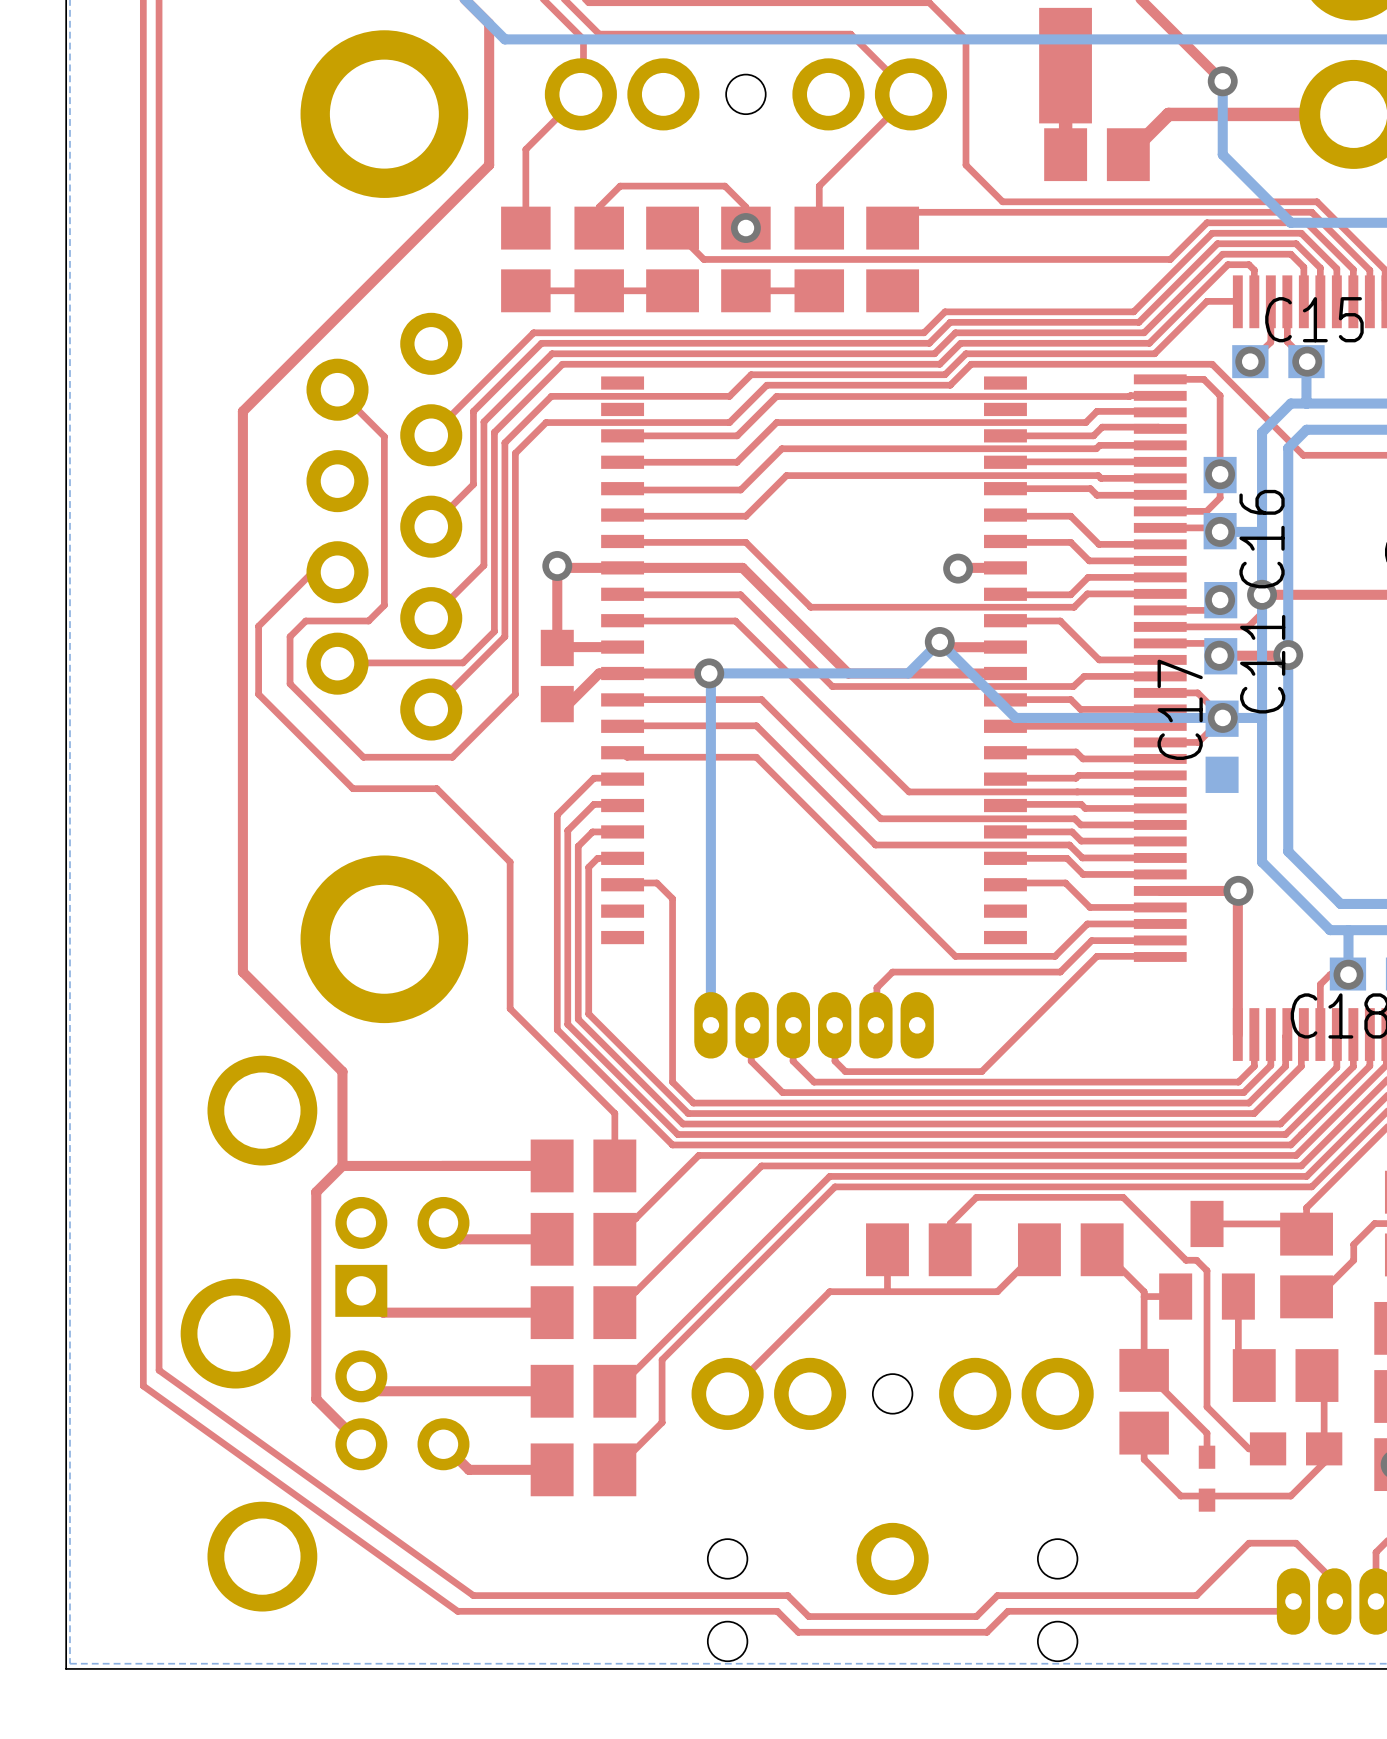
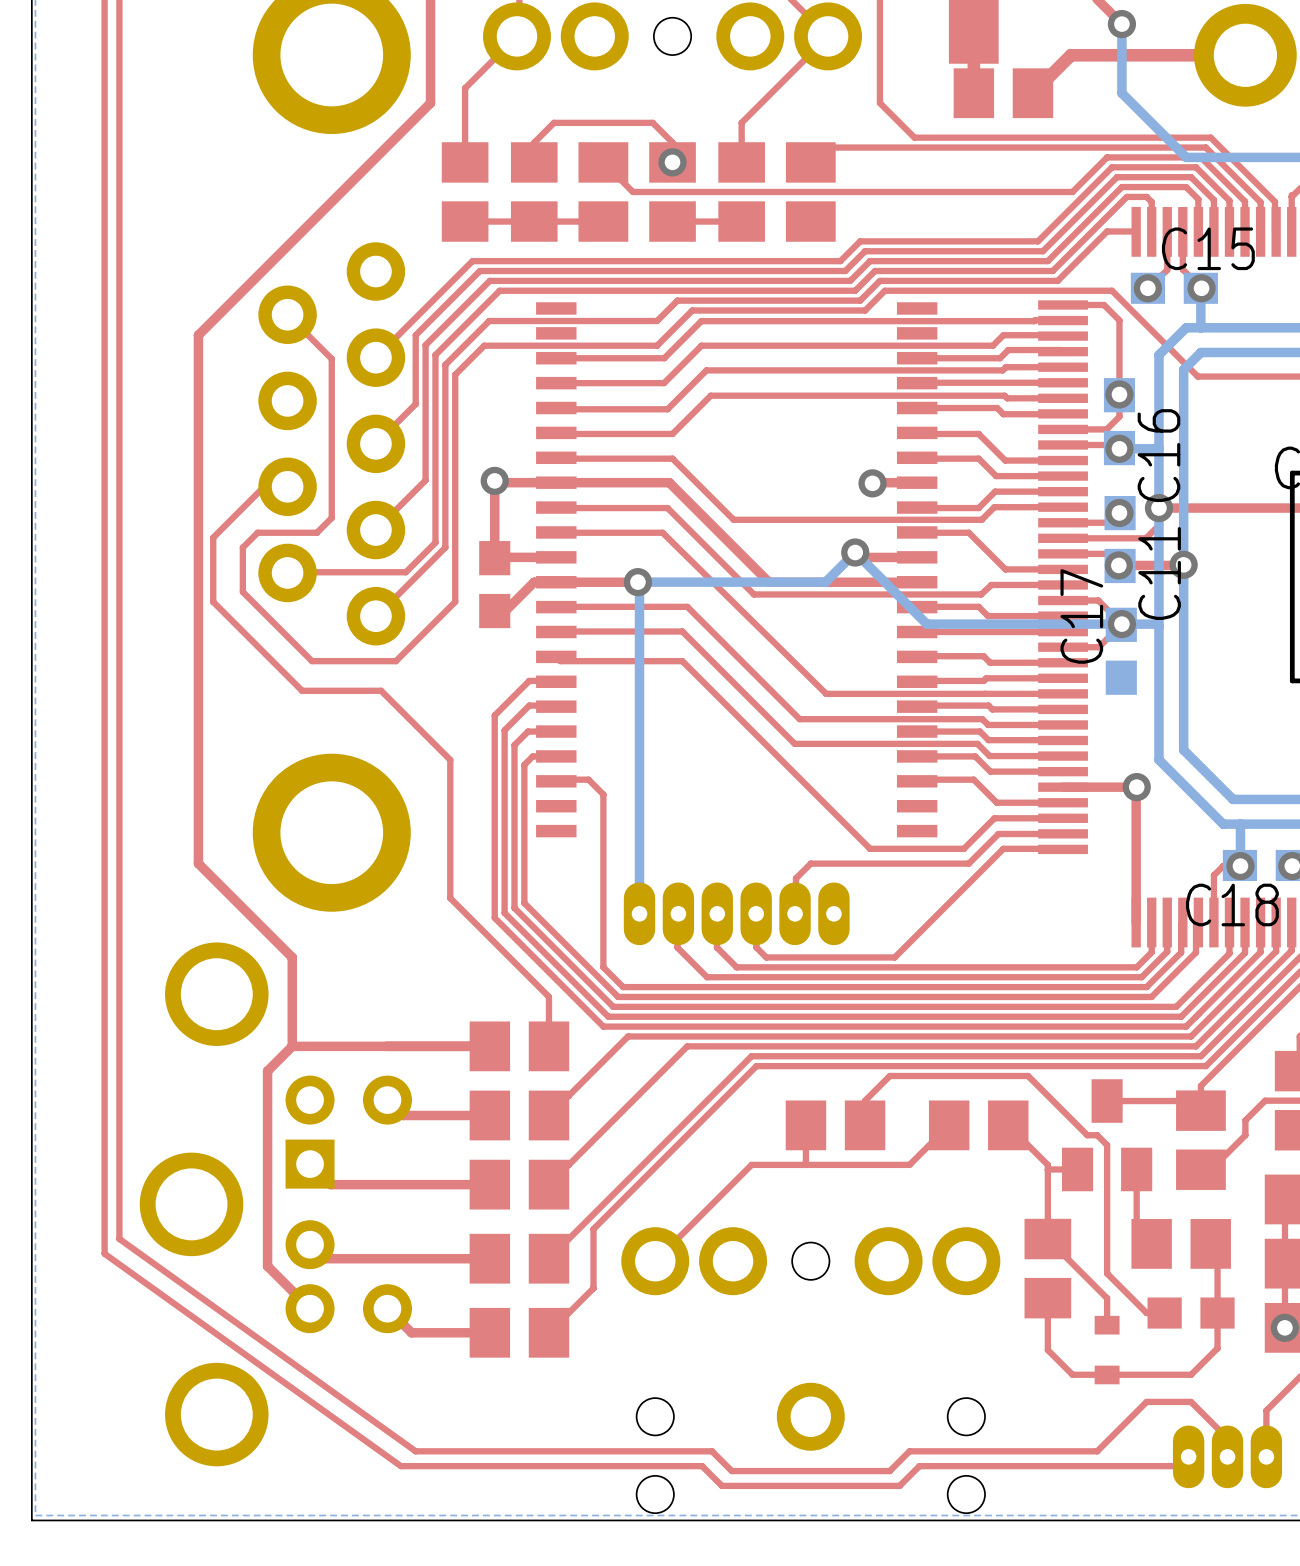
part footprint: [1198, 1445, 1216, 1512] -> [1094, 1315, 1120, 1385]
top track: (1144, 1459) (1180, 1496) (1201, 1496) (1205, 1500) (1211, 1496) (1290, 1496) (1324, 1462) -> (1107, 1374) (1191, 1374) (1217, 1348) (1217, 1326)
top track: none -> (1047, 1322) (1047, 1350) (1072, 1374) (1106, 1374)

